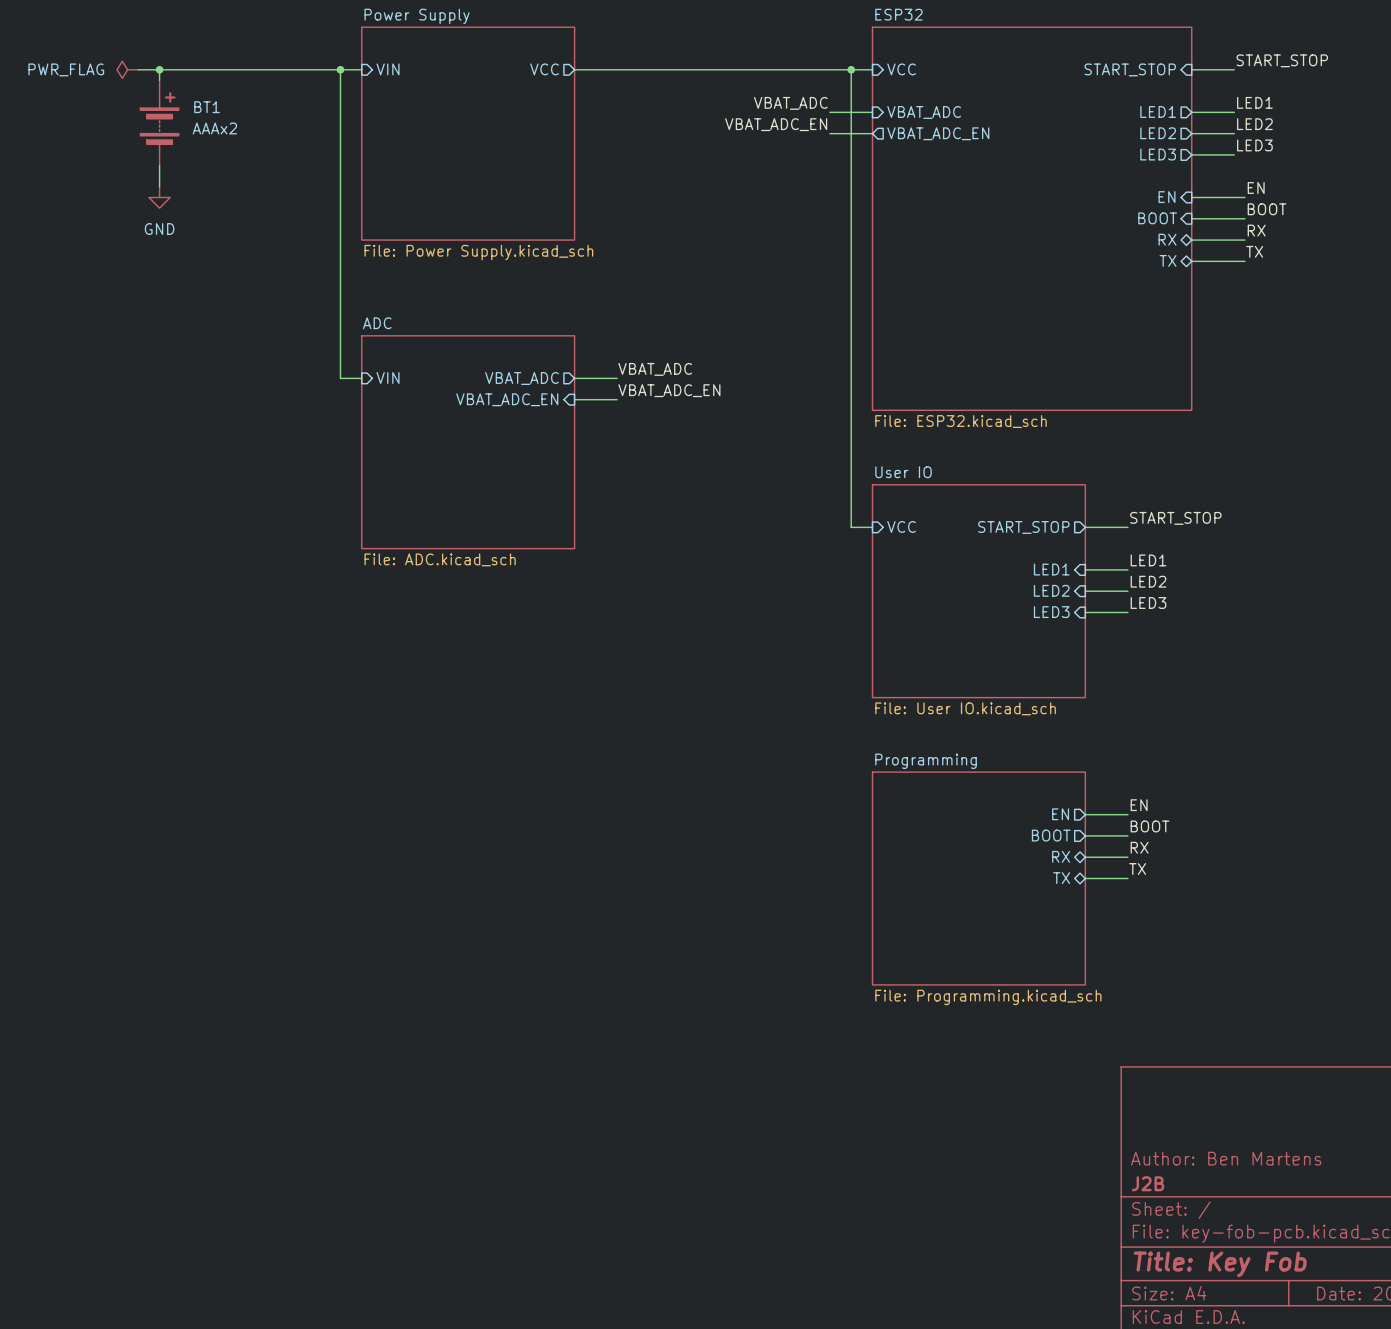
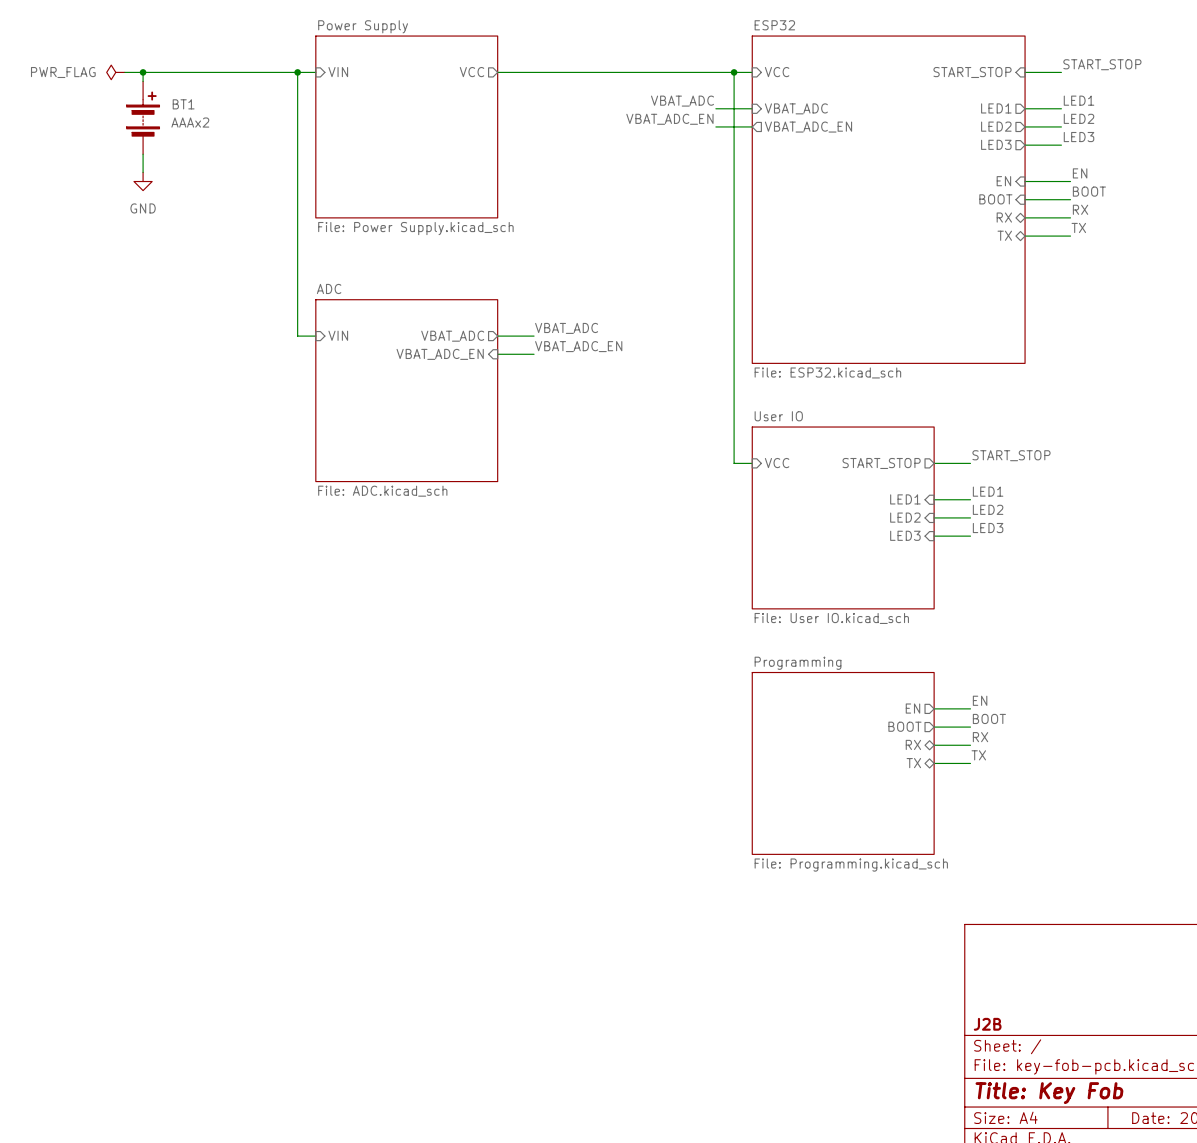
title block: Author: Ben Martens (1226, 1158) -> none

